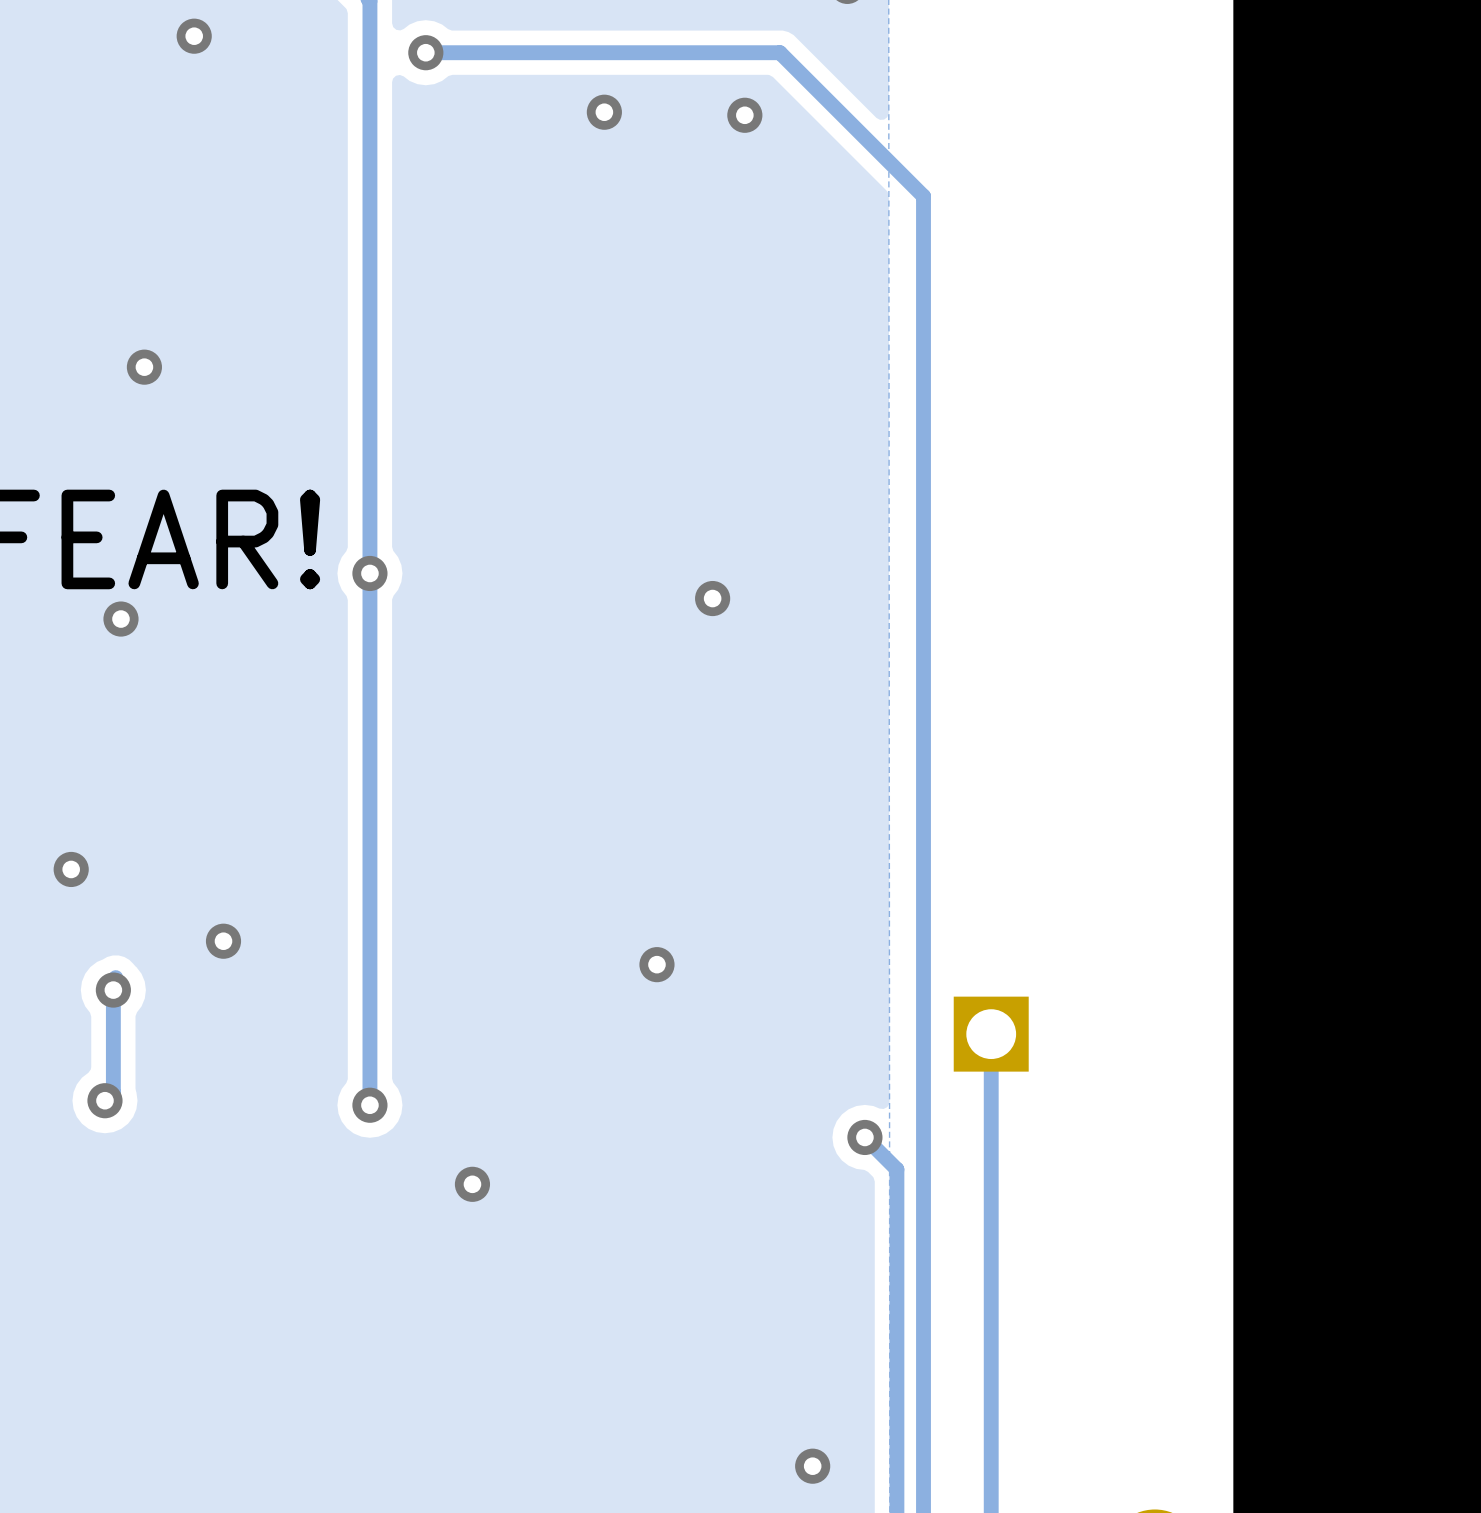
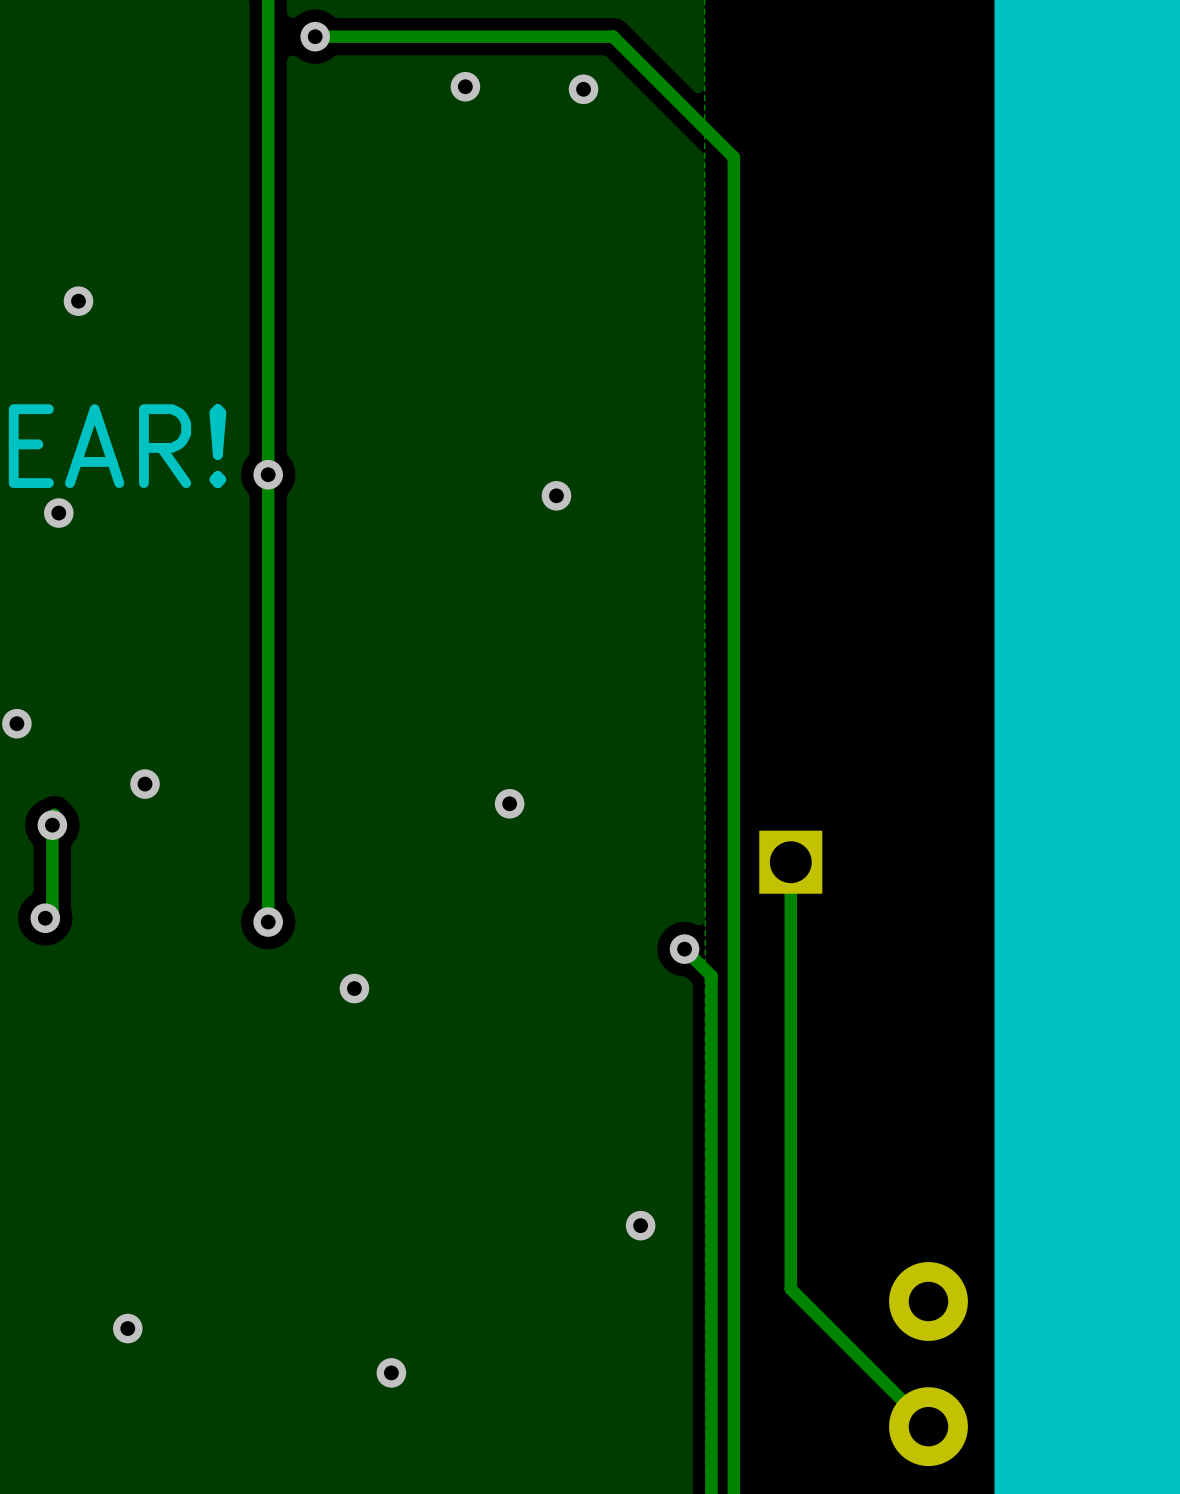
via: (194, 36) -> none

